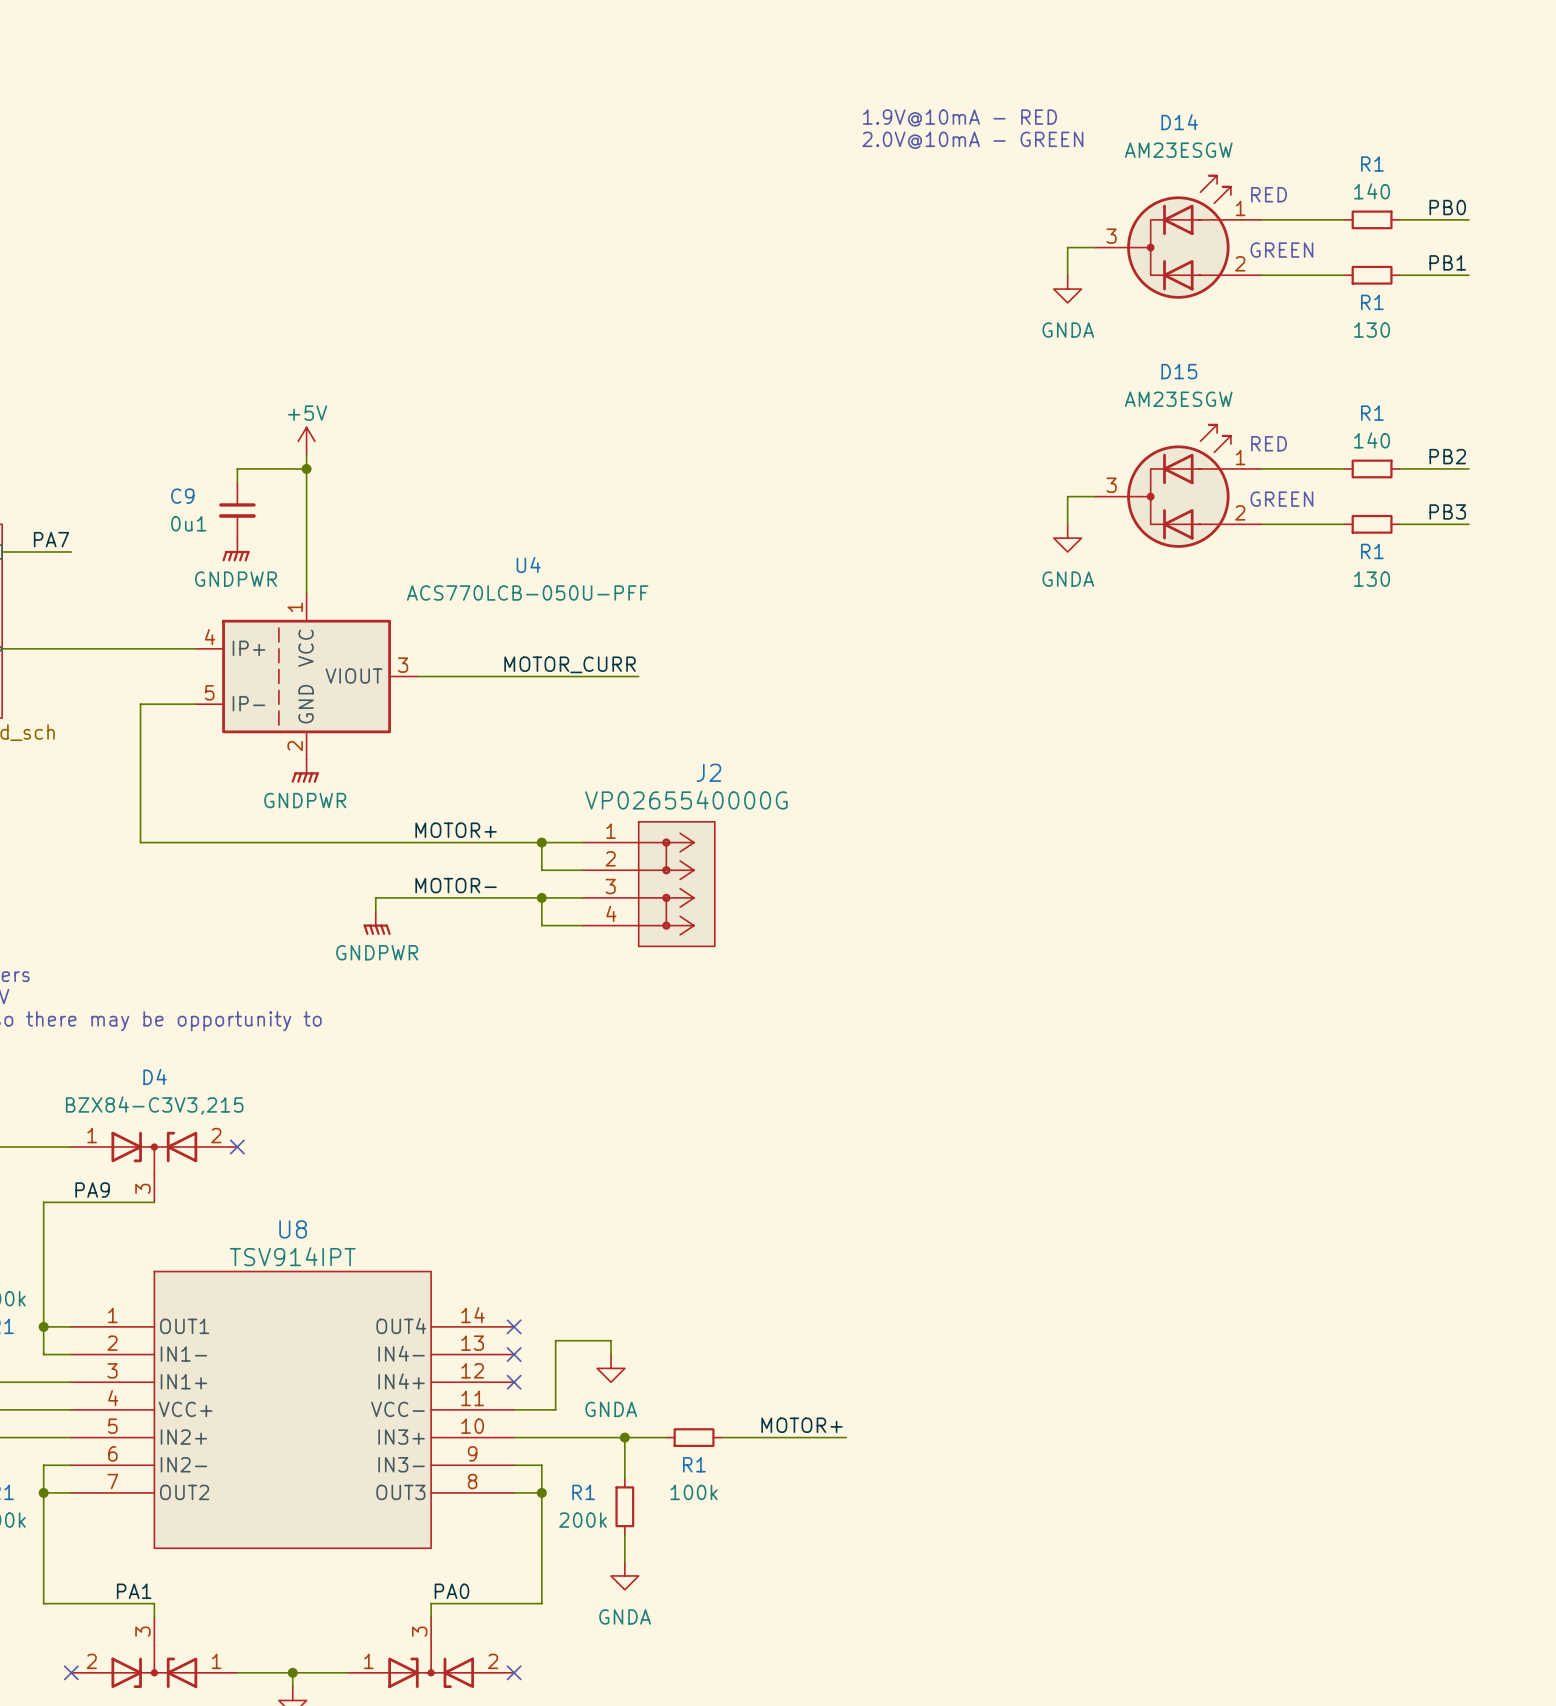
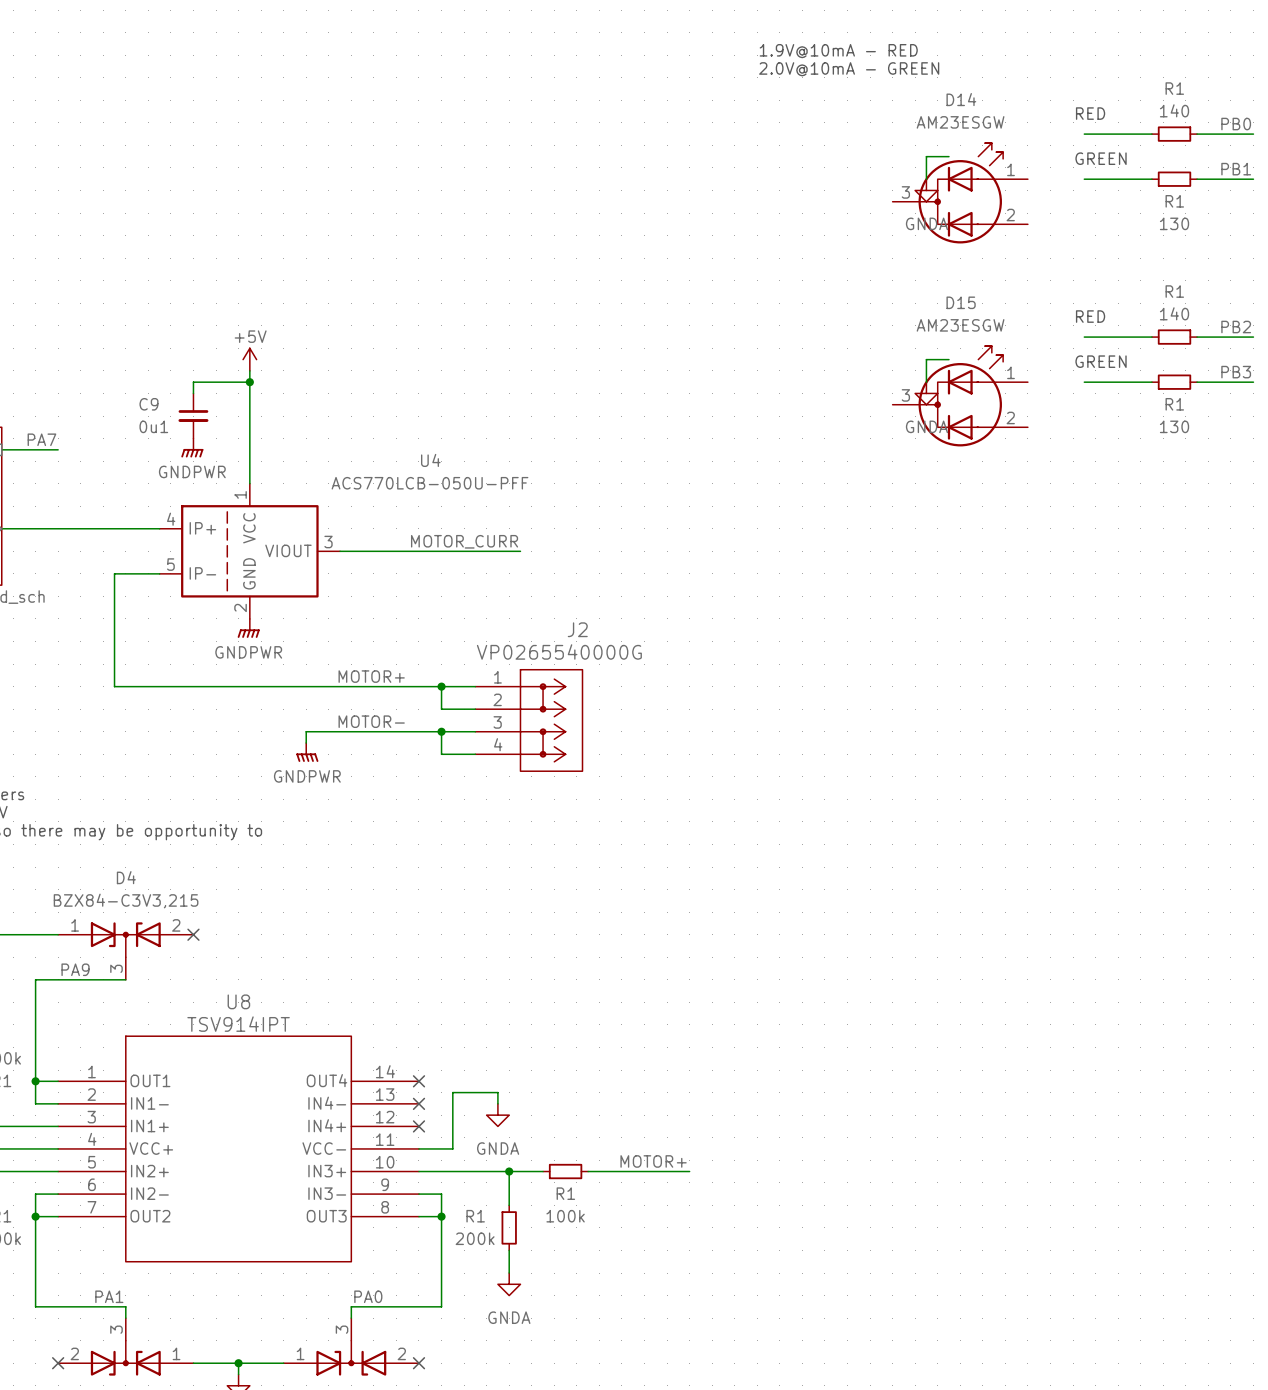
text position: 1.9V@10mA - RED (960, 118) -> 1.9V@10mA - RED (838, 51)
text position: 2.0V@10mA - GREEN (972, 140) -> 2.0V@10mA - GREEN (849, 69)
text position: RED (1269, 194) -> RED (1090, 113)
label position: PB0 (1447, 207) -> PB0 (1236, 124)
wire: (1261, 219) (1330, 219) -> none
wire: none -> (1095, 179) (1140, 179)
R1 position: (1372, 219) -> (1174, 134)
wire: (1413, 219) (1468, 219) -> (1253, 179) (1197, 179)
wire: (1095, 247) (1067, 247) (1067, 275) -> (948, 156) (926, 156) (926, 179)
text position: GREEN (1281, 250) -> GREEN (1101, 158)
label position: PB1 (1447, 262) -> PB1 (1236, 169)
wire: (1261, 275) (1344, 275) -> (1084, 134) (1151, 134)
R1 position: (1372, 275) -> (1174, 179)
wire: (1399, 275) (1468, 275) -> (1197, 134) (1253, 134)
power symbol position: GNDA (1067, 289) -> GNDA (926, 190)
text position: RED (1269, 443) -> RED (1090, 316)
label position: PB2 (1447, 456) -> PB2 (1236, 327)
wire: (1261, 468) (1330, 468) -> none
wire: none -> (1095, 382) (1140, 382)
R1 position: (1372, 468) -> (1174, 337)
wire: (1413, 468) (1468, 468) -> (1253, 382) (1197, 382)
wire: (1095, 496) (1067, 496) (1067, 524) -> (948, 359) (926, 359) (926, 382)
text position: GREEN (1281, 499) -> GREEN (1101, 361)
label position: PB3 (1447, 511) -> PB3 (1236, 372)
wire: (1261, 524) (1344, 524) -> (1084, 337) (1151, 337)
R1 position: (1372, 524) -> (1174, 382)
wire: (1399, 524) (1468, 524) -> (1197, 337) (1253, 337)
power symbol position: GNDA (1067, 538) -> GNDA (926, 393)

